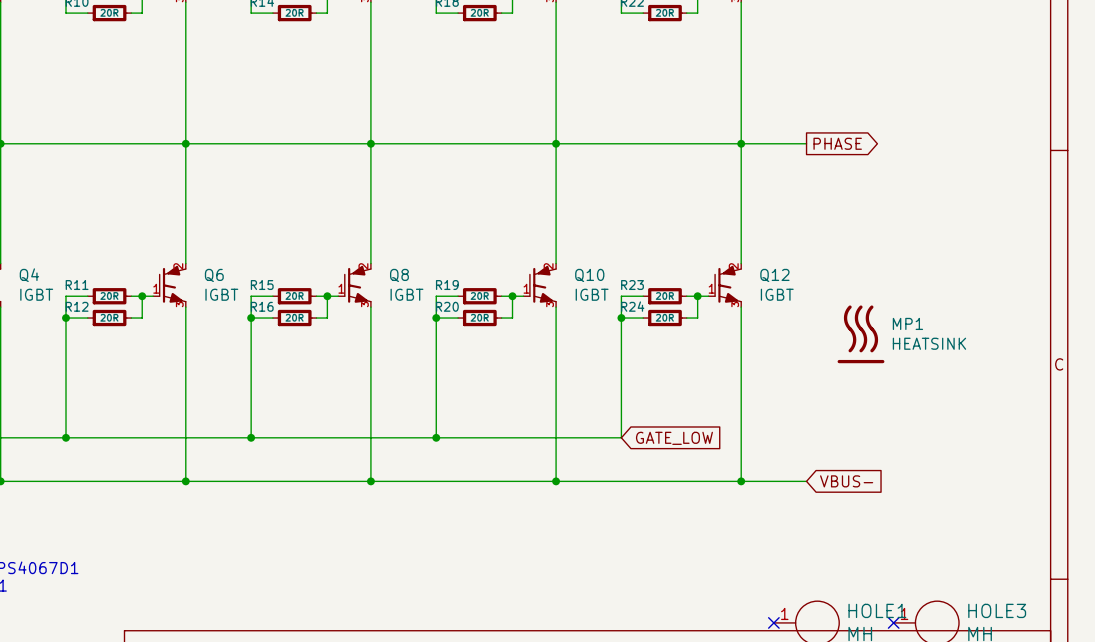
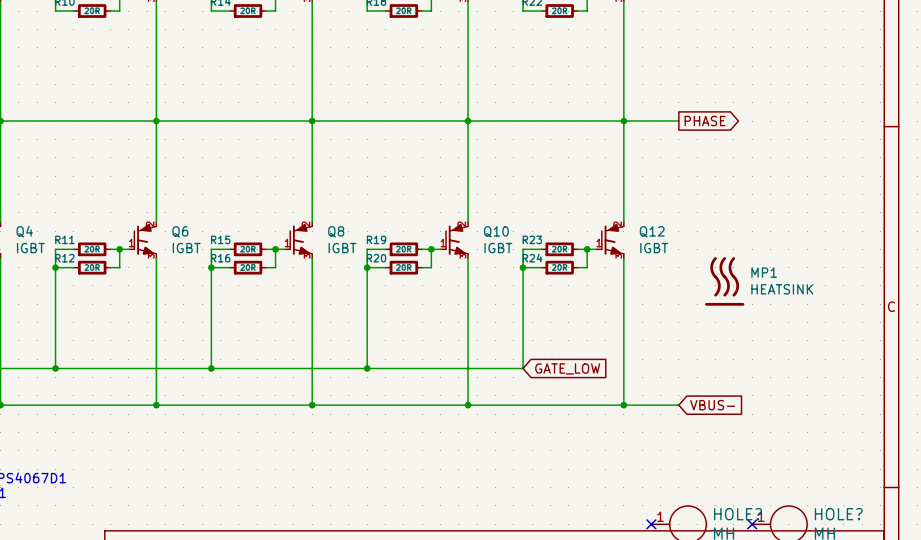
HOLE1 name: HOLE1 (877, 610) -> HOLE? (737, 514)
HOLE3 name: HOLE3 (997, 610) -> HOLE? (838, 514)

